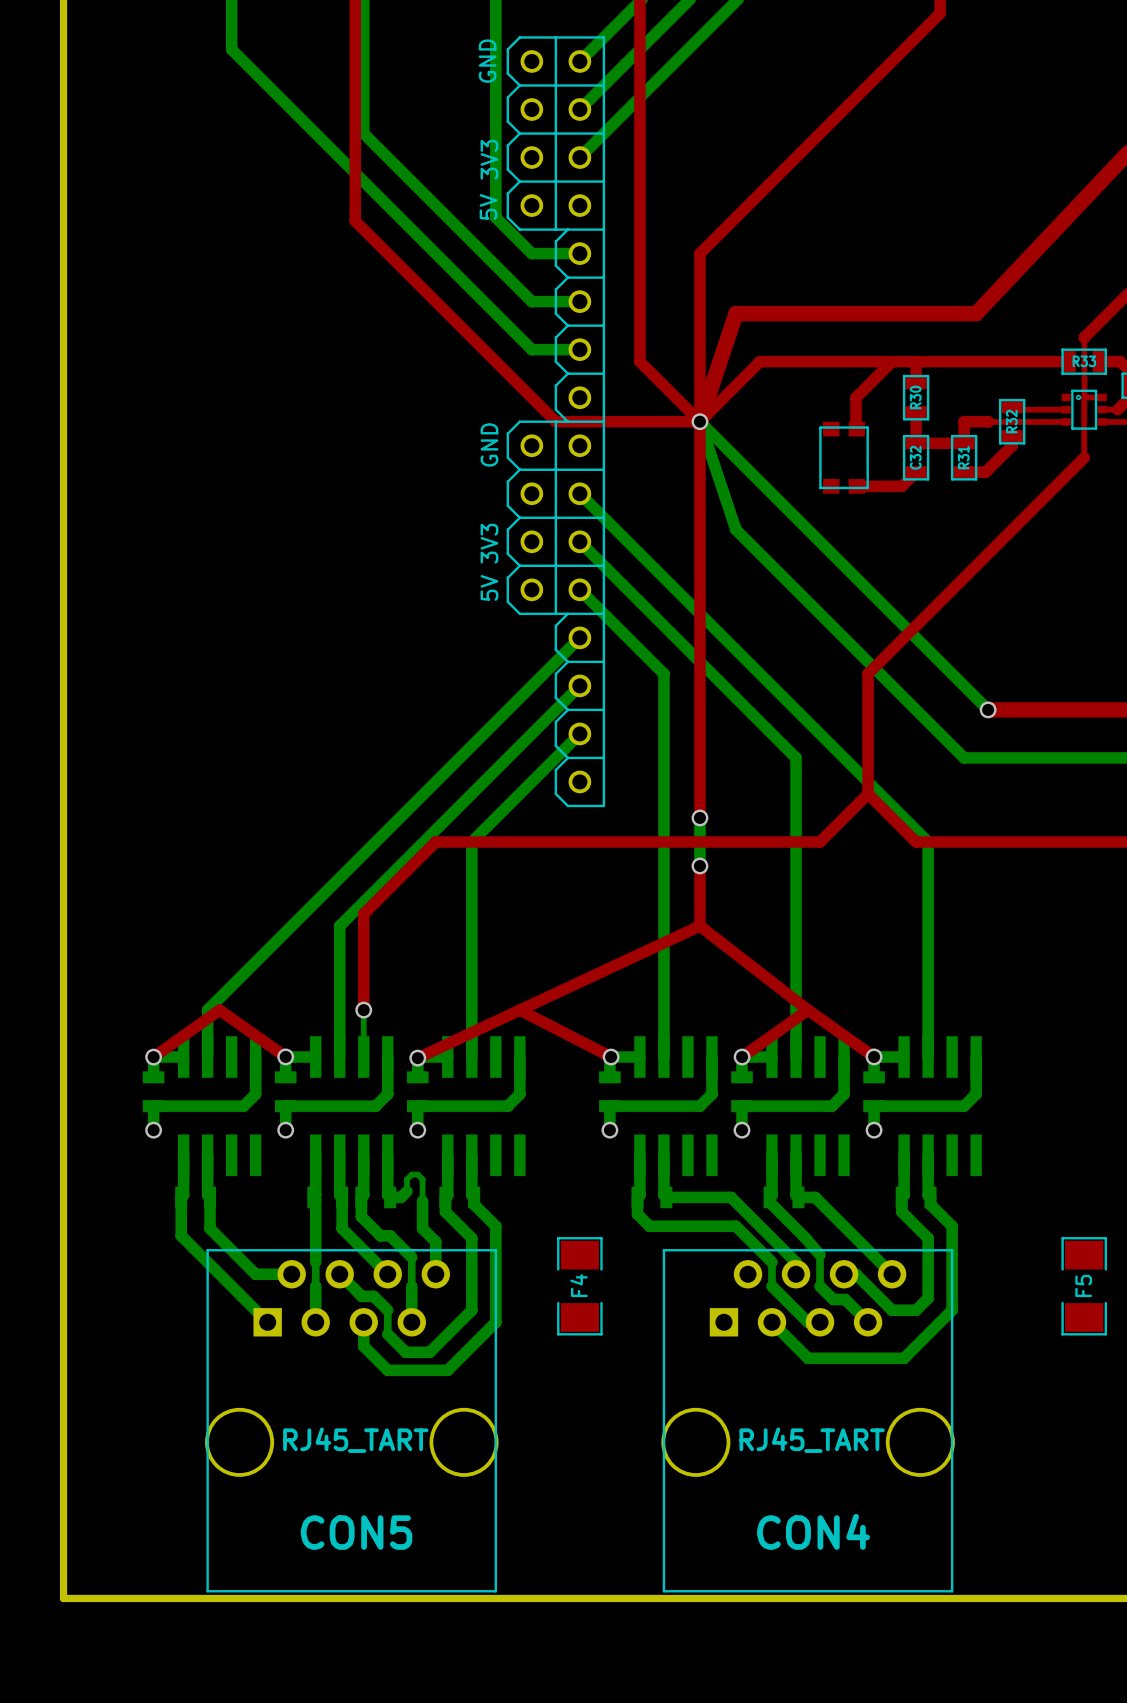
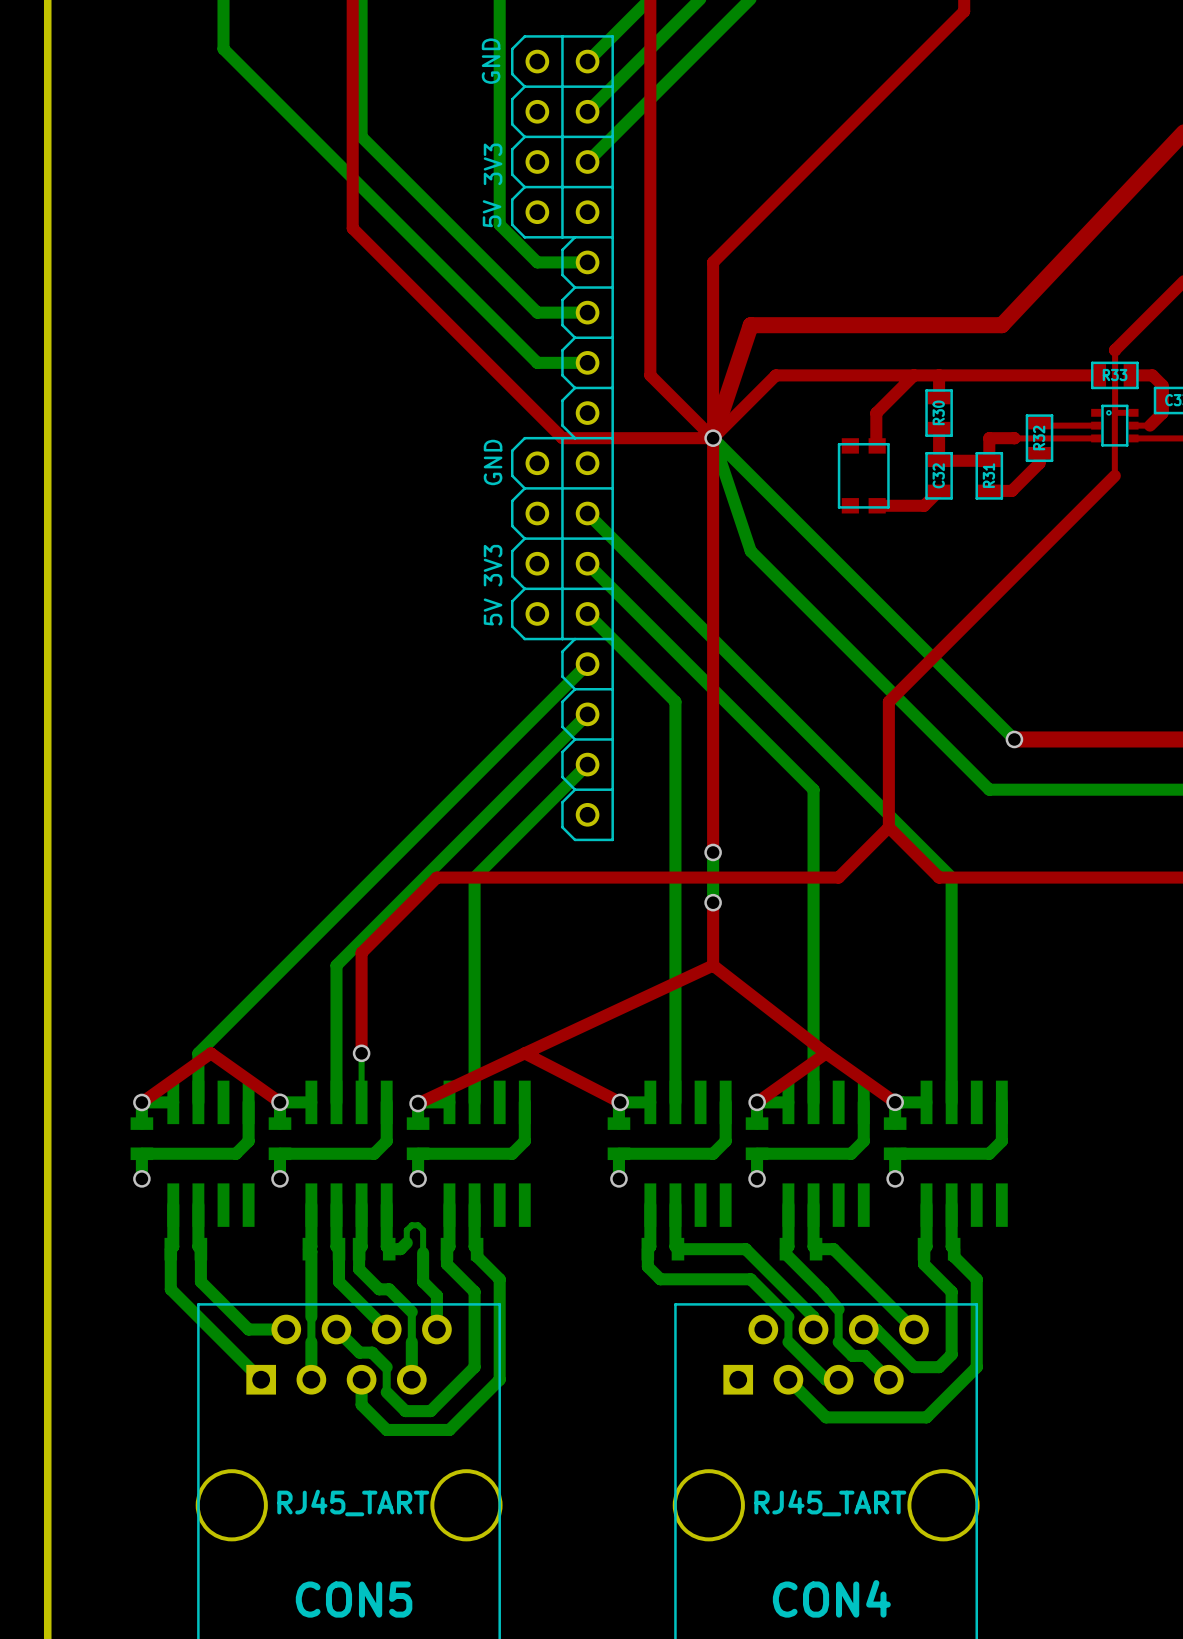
F4: (579, 1286) -> none
F5: (1084, 1286) -> none

